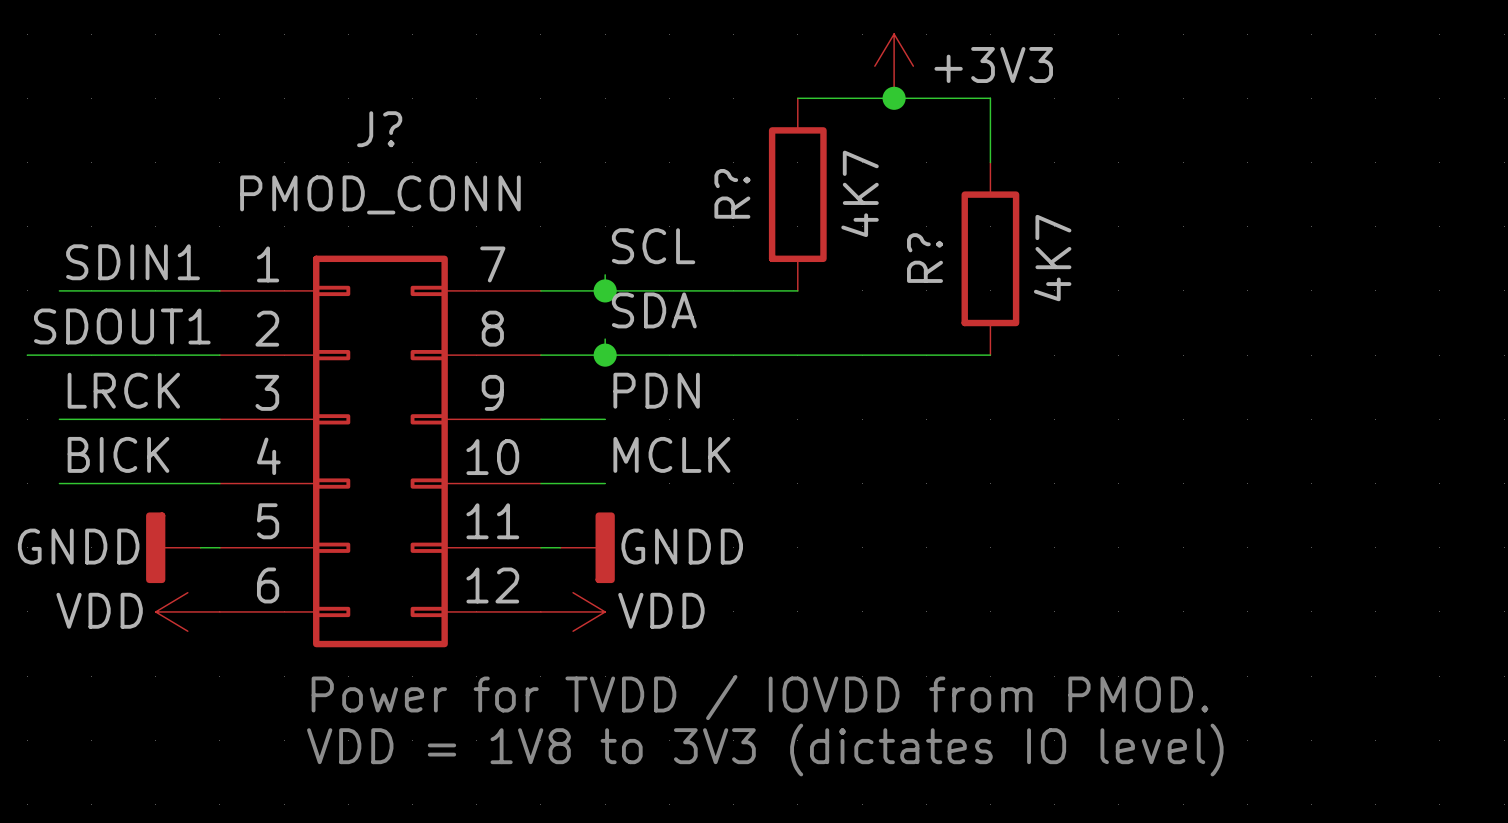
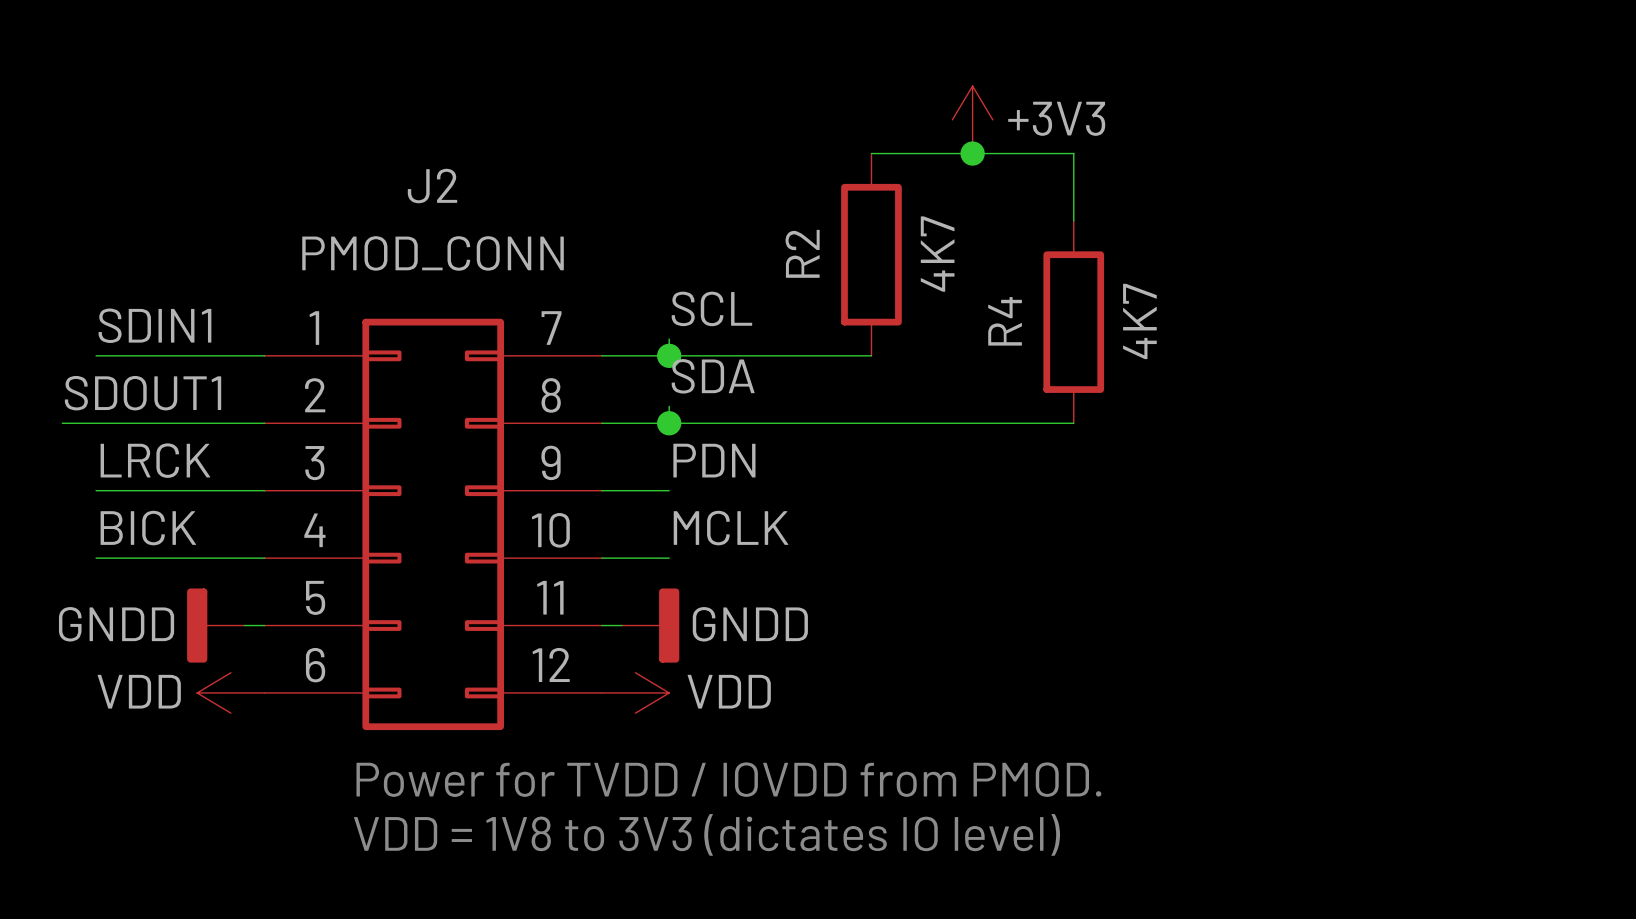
J? name: J? (379, 129) -> J2 (432, 186)
R? name: R? (732, 193) -> R2 (802, 253)
R? name: R? (925, 258) -> R4 (1005, 321)

